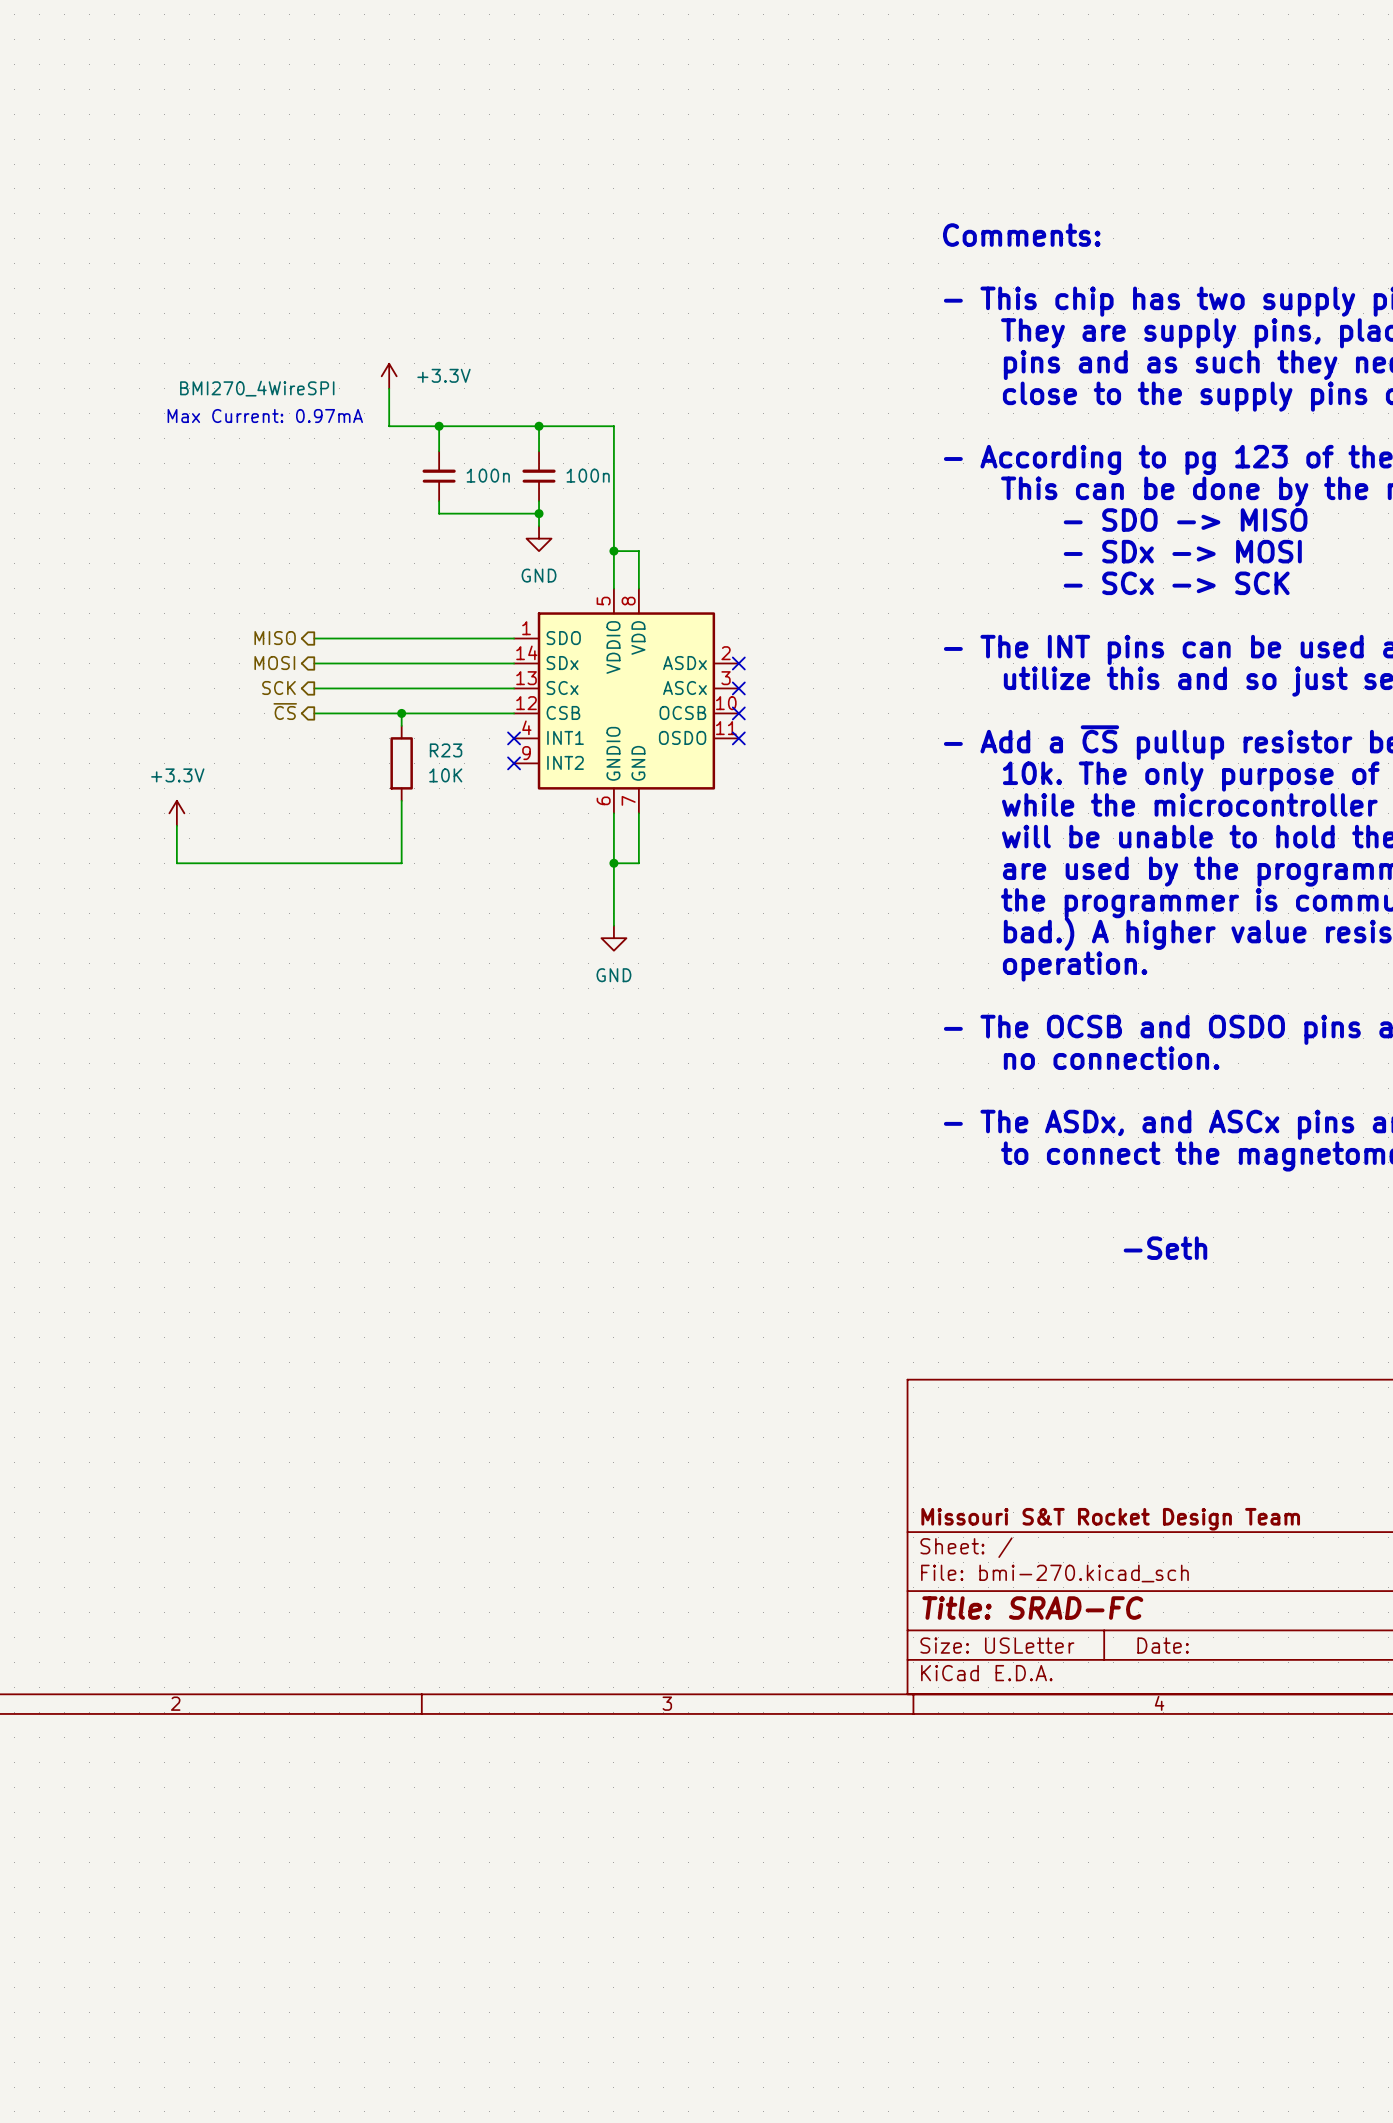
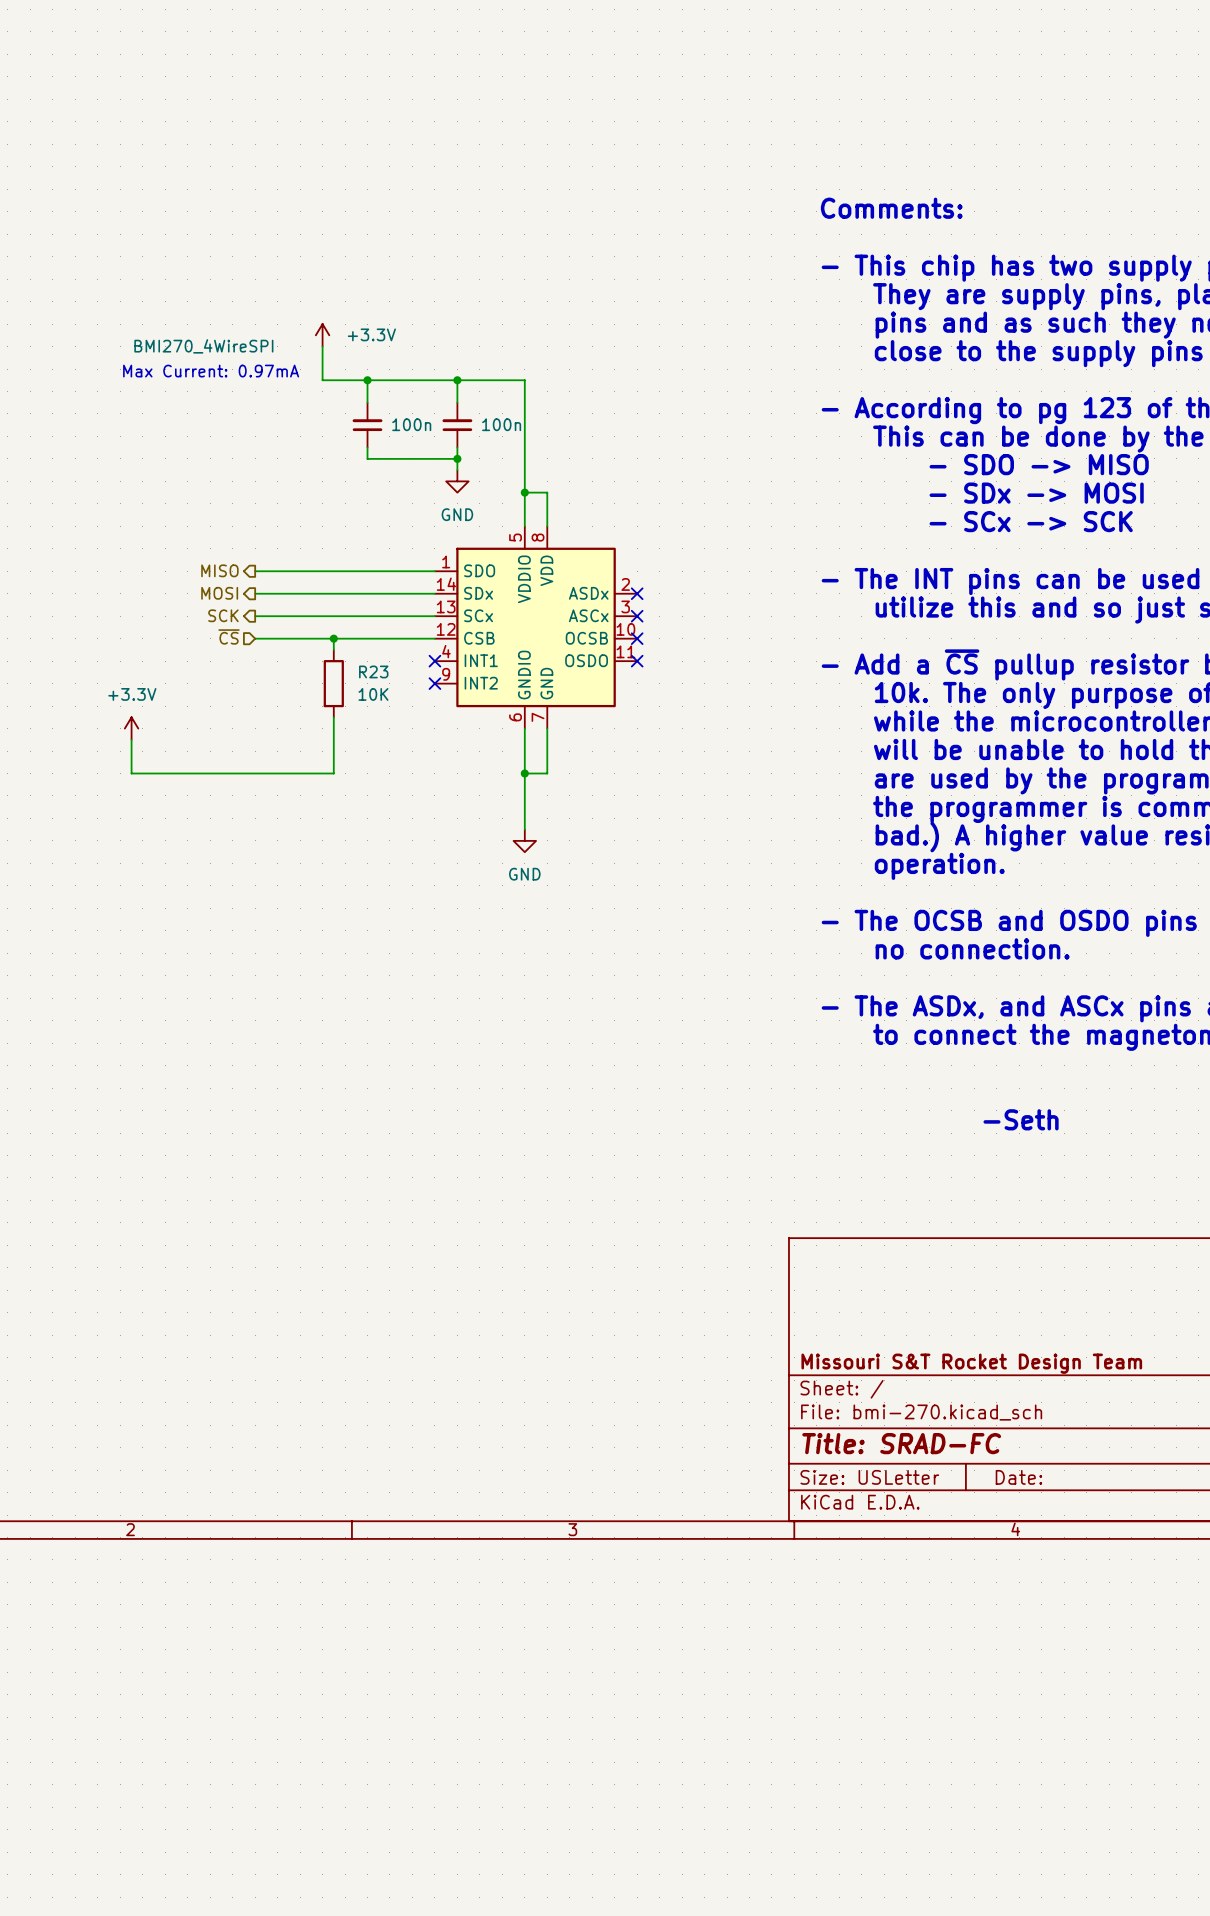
hierarchical label shape: output (285, 711) -> input (229, 636)

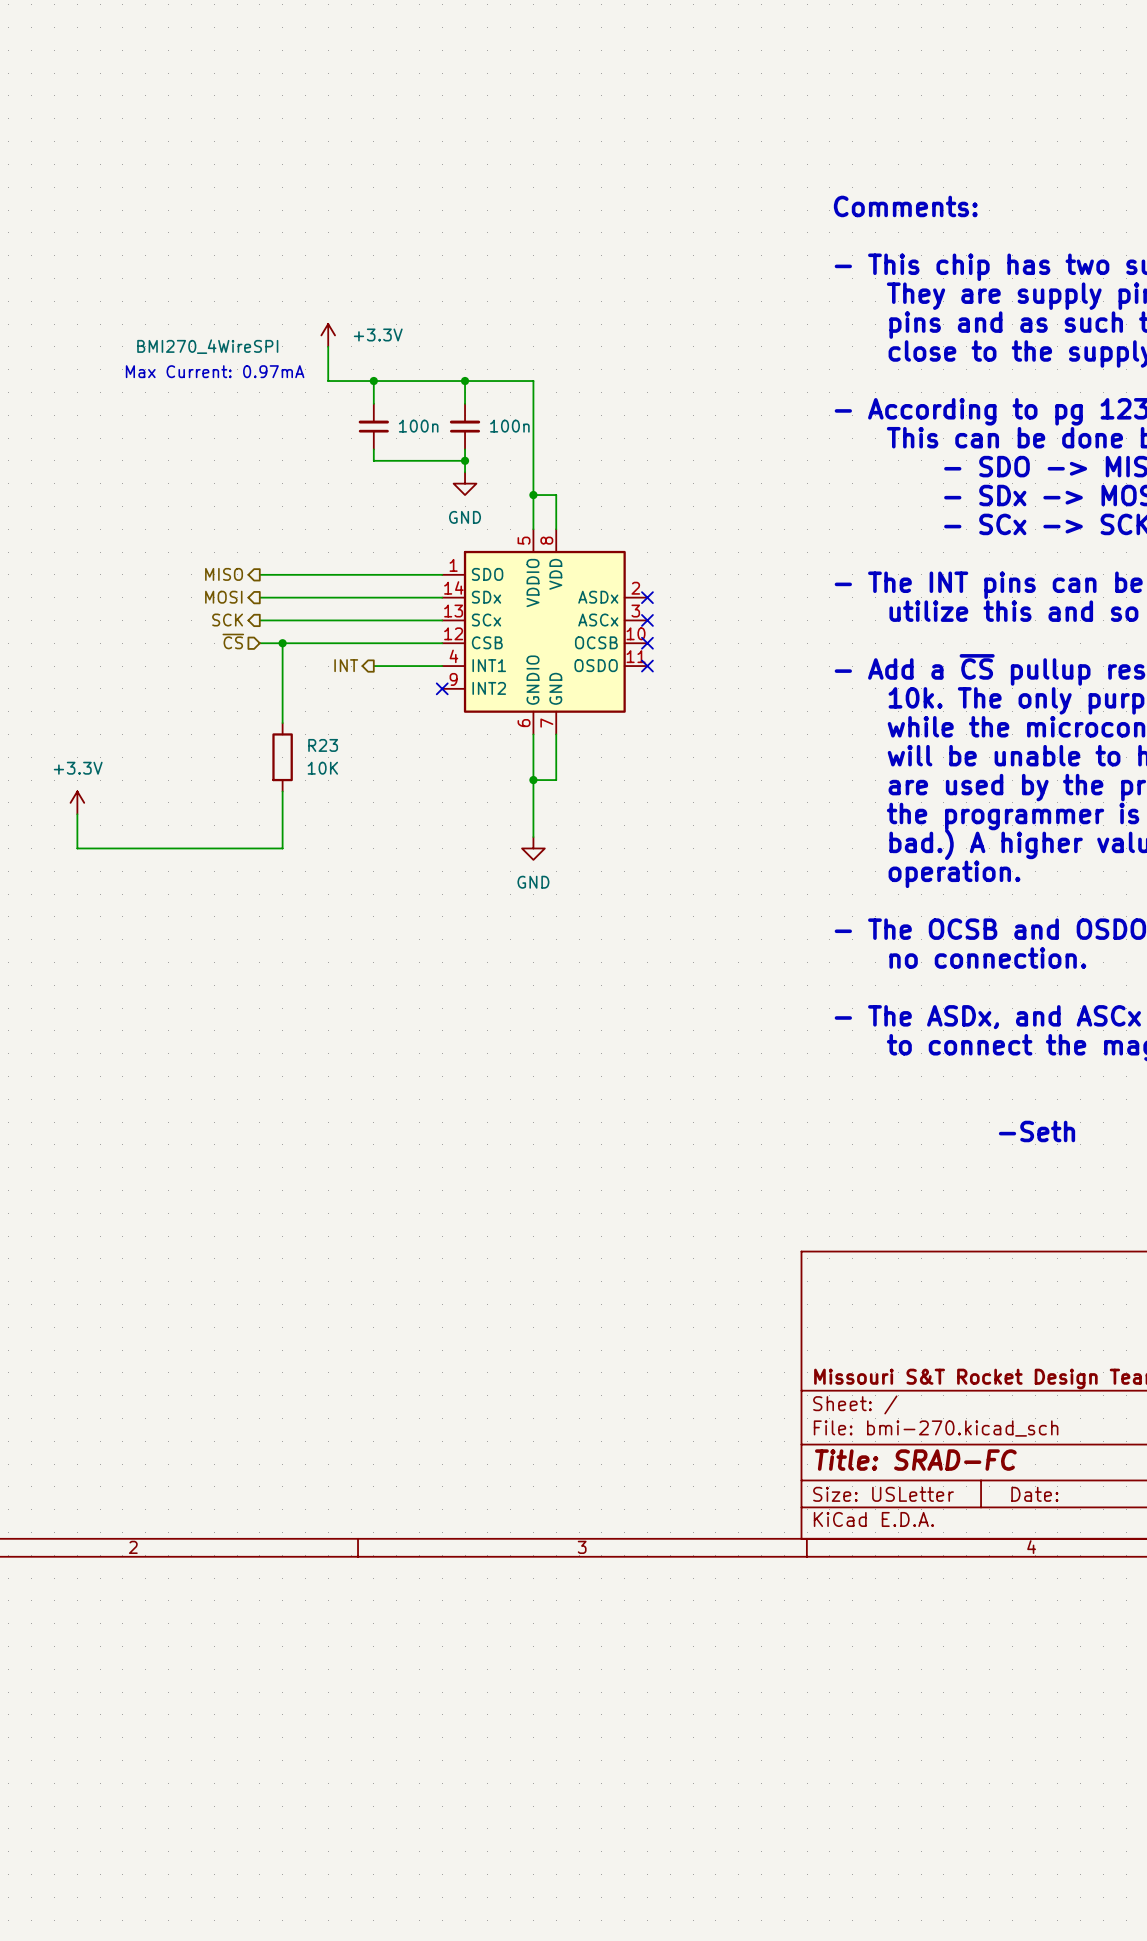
wire: none -> (282, 643) (282, 723)
junction: none -> (282, 643)
wire: (333, 638) (333, 649) -> none
junction: (333, 638) -> none
hierarchical label: none -> INT (346, 665)
wire: none -> (373, 666) (442, 666)
no-connect mark: (434, 661) -> none
R23 position: (333, 683) -> (282, 757)
wire: (333, 717) (333, 773) (131, 773) (131, 739) -> (282, 791) (282, 848) (77, 848) (77, 814)
power symbol position: +3.3V (131, 728) -> +3.3V (77, 802)

